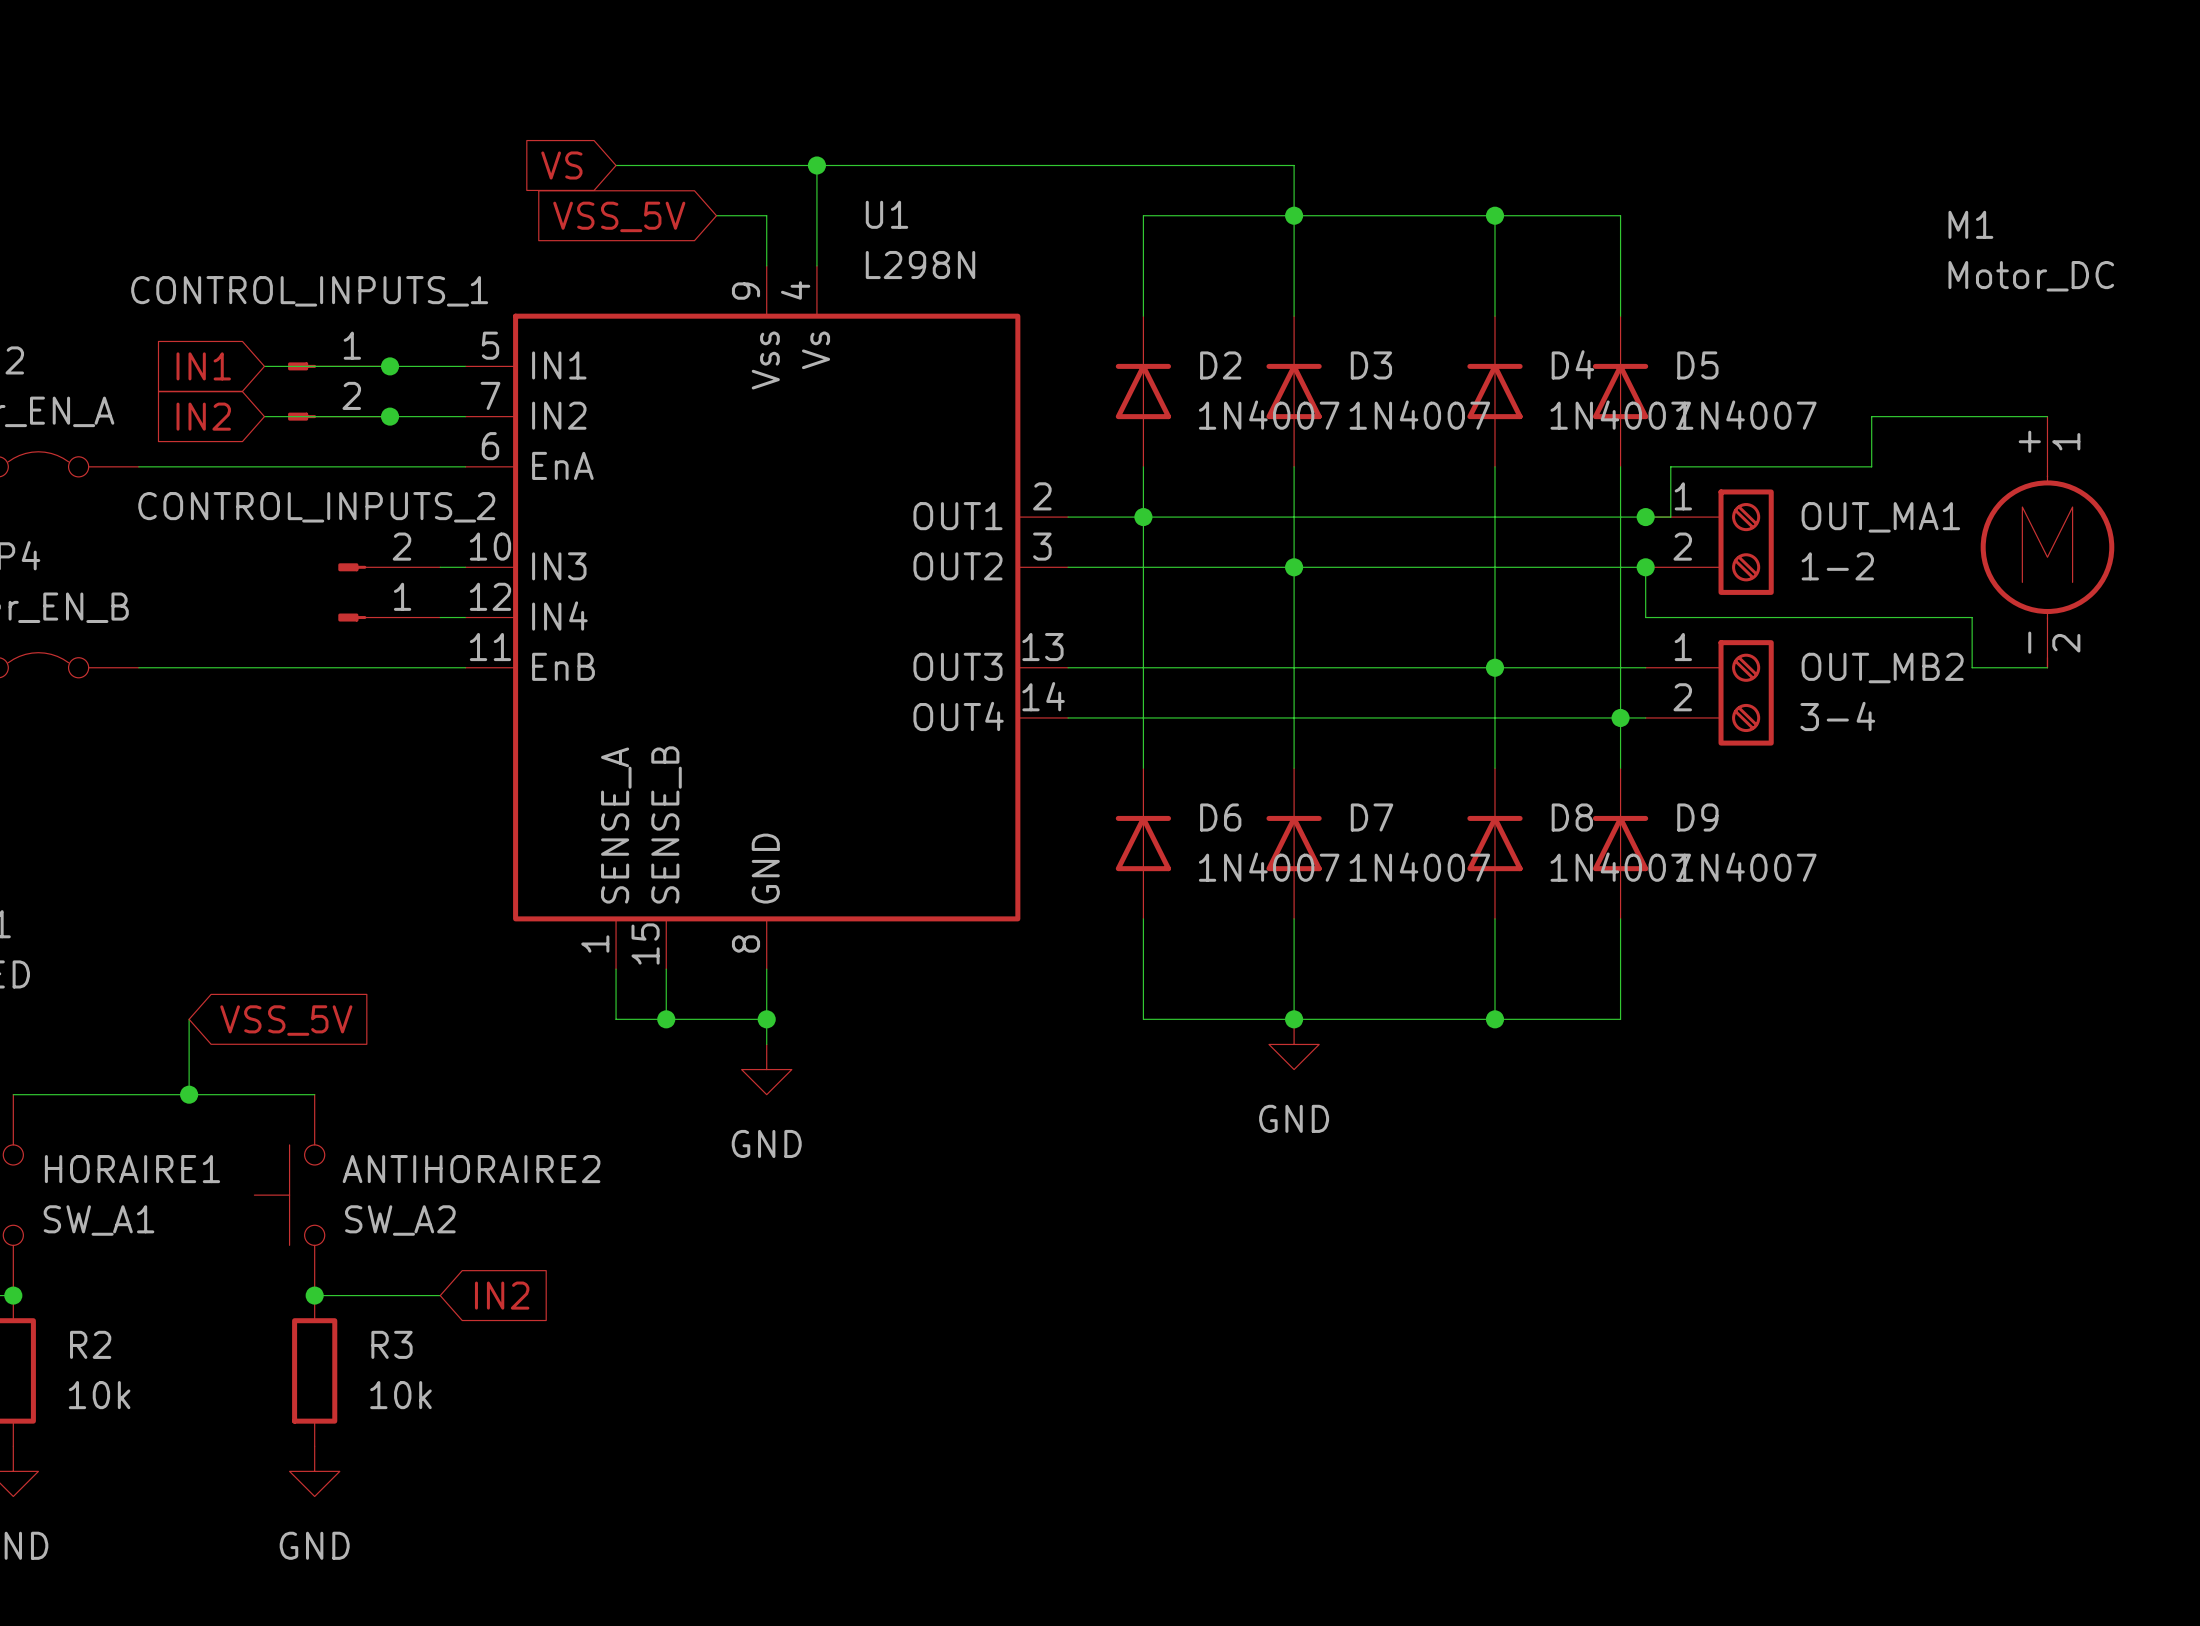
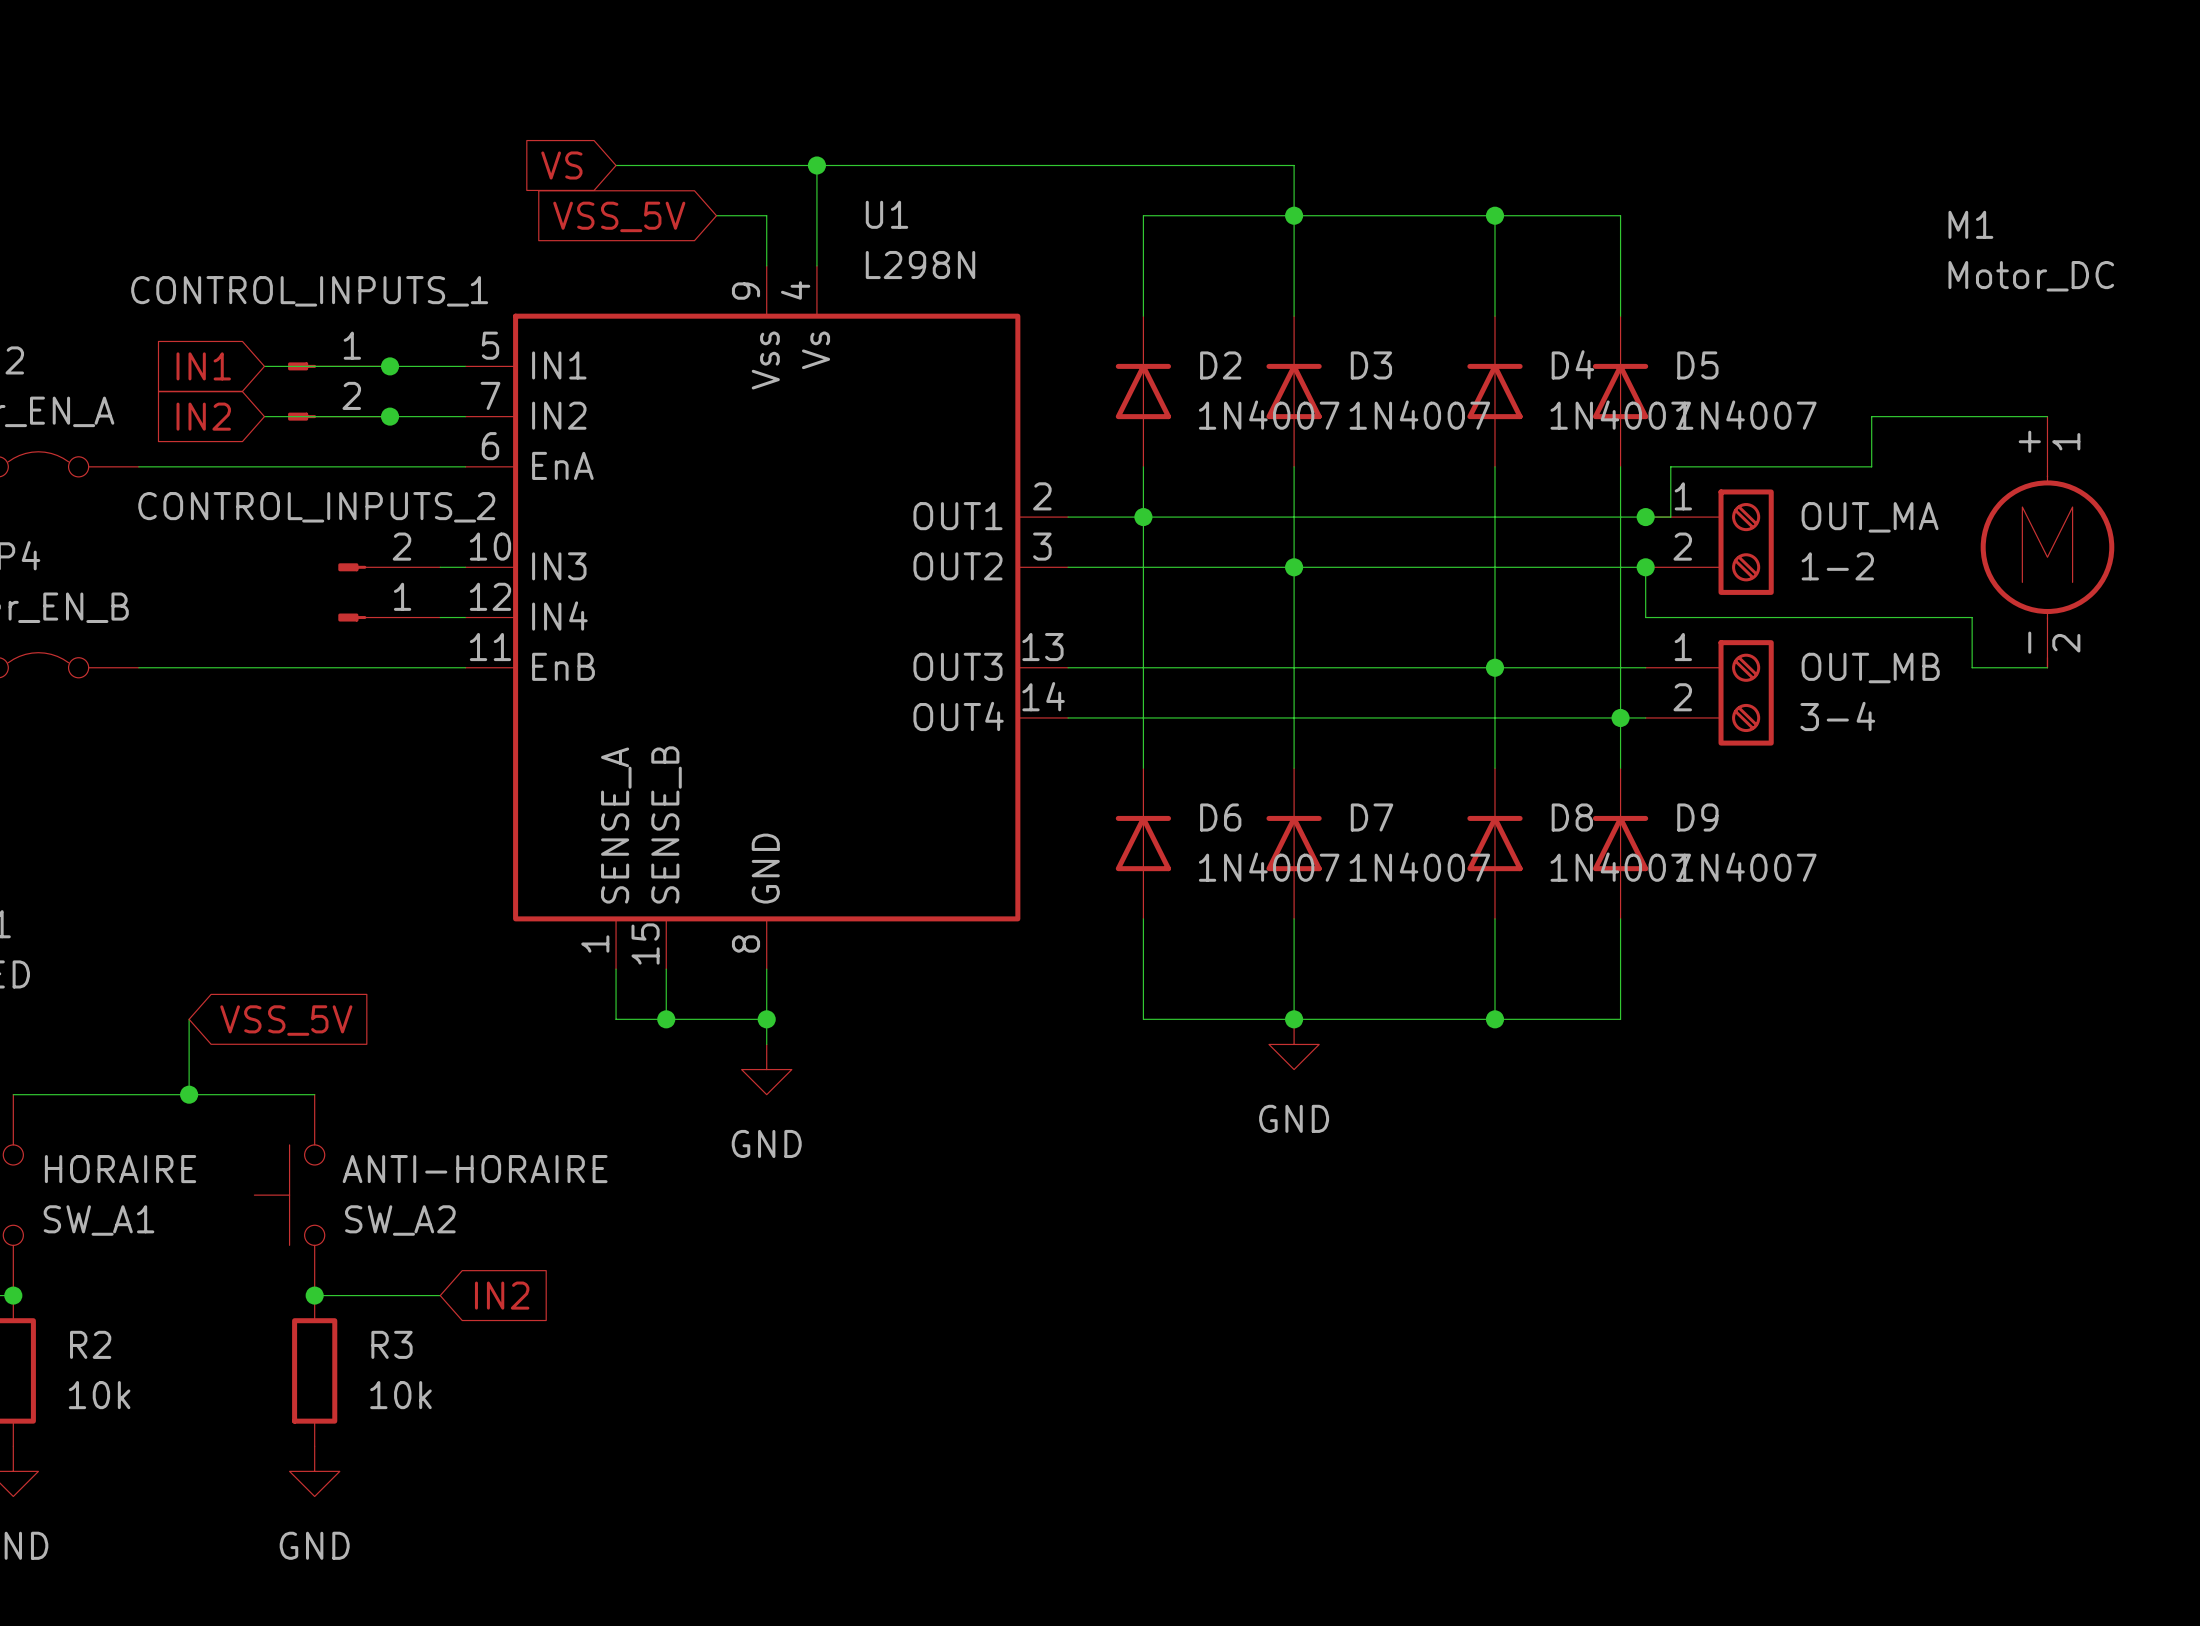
OUT_MA1 name: OUT_MA1 (1880, 517) -> OUT_MA (1870, 517)
OUT_MB2 name: OUT_MB2 (1882, 668) -> OUT_MB (1870, 668)
HORAIRE1 name: HORAIRE1 (132, 1169) -> HORAIRE (120, 1169)
ANTIHORAIRE2 name: ANTIHORAIRE2 (471, 1169) -> ANTI-HORAIRE (475, 1169)

